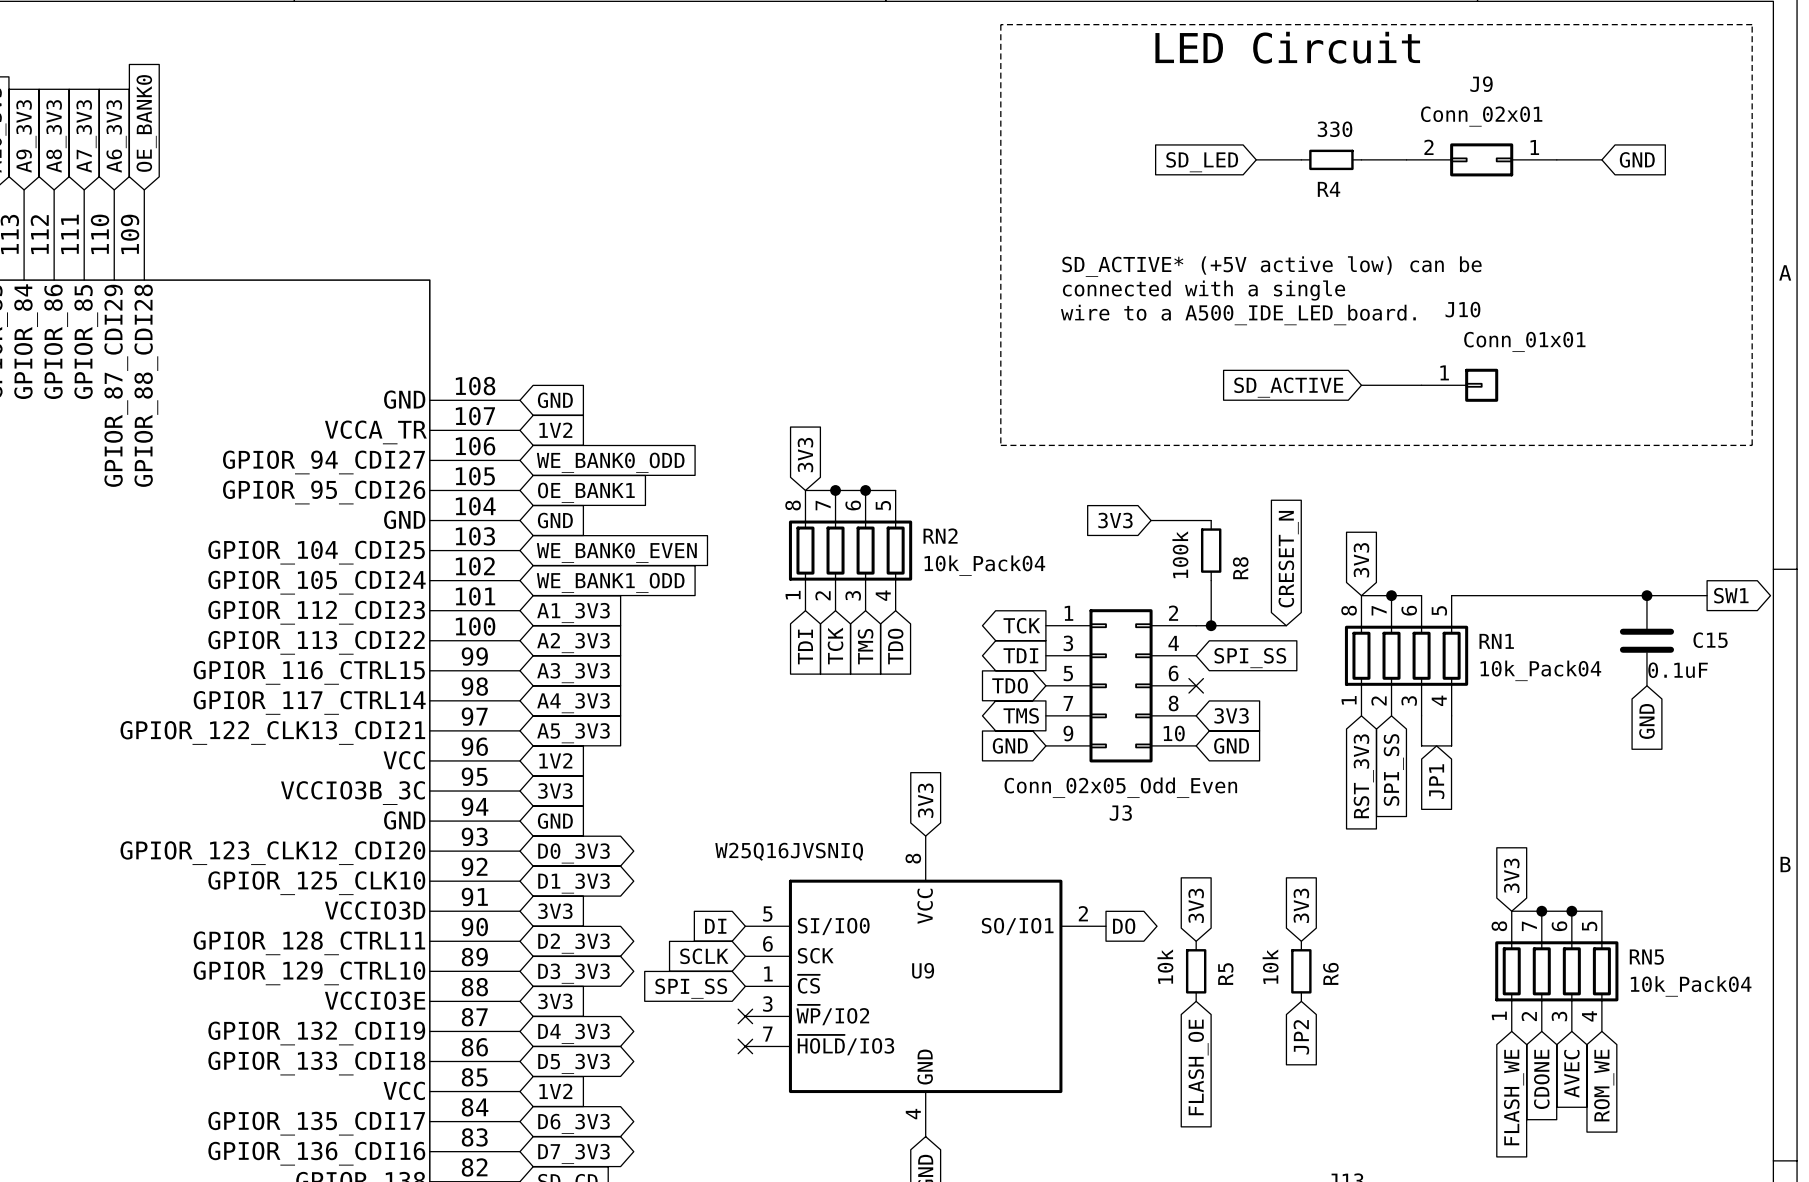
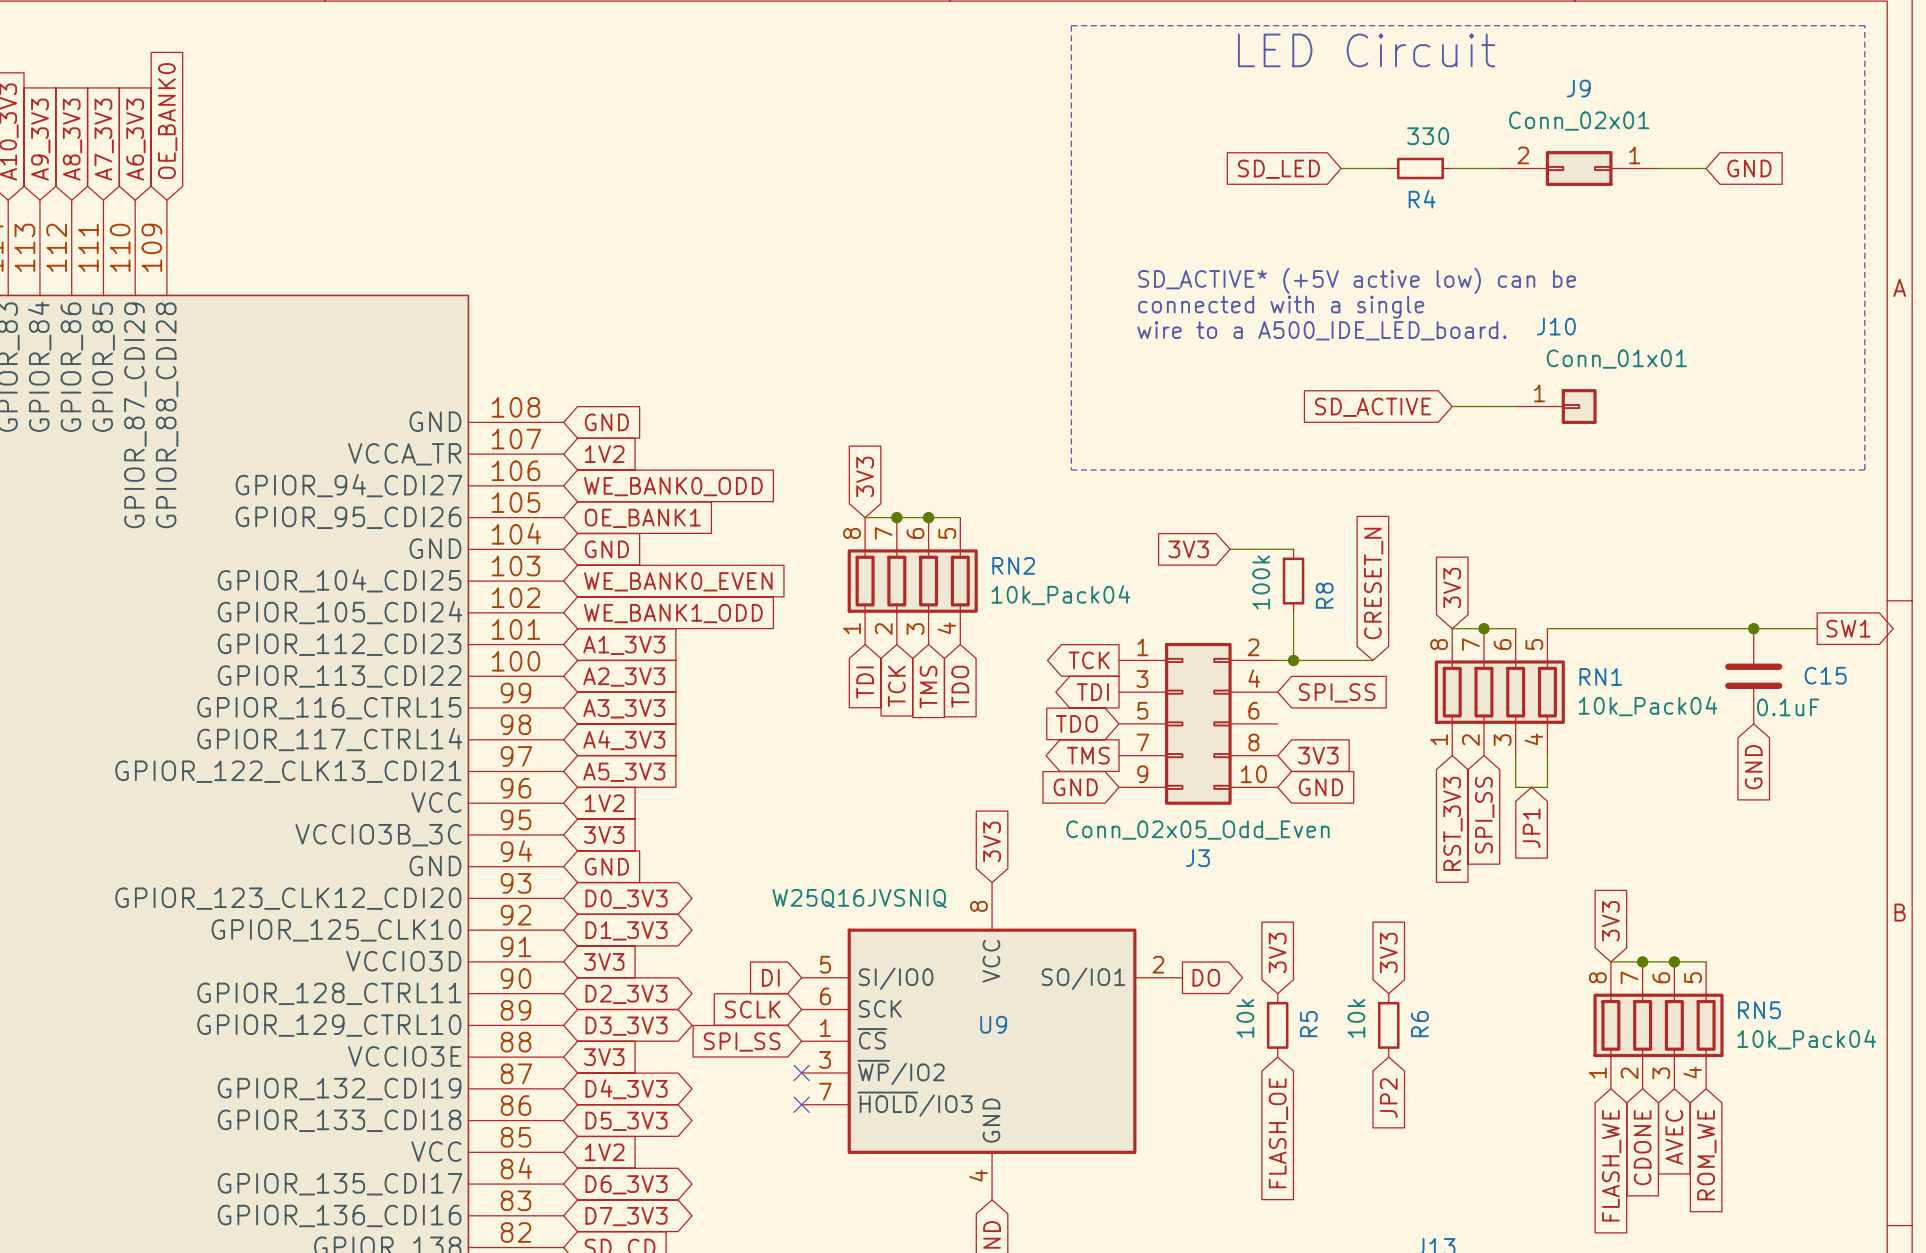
no-connect mark: (1196, 685) -> none

